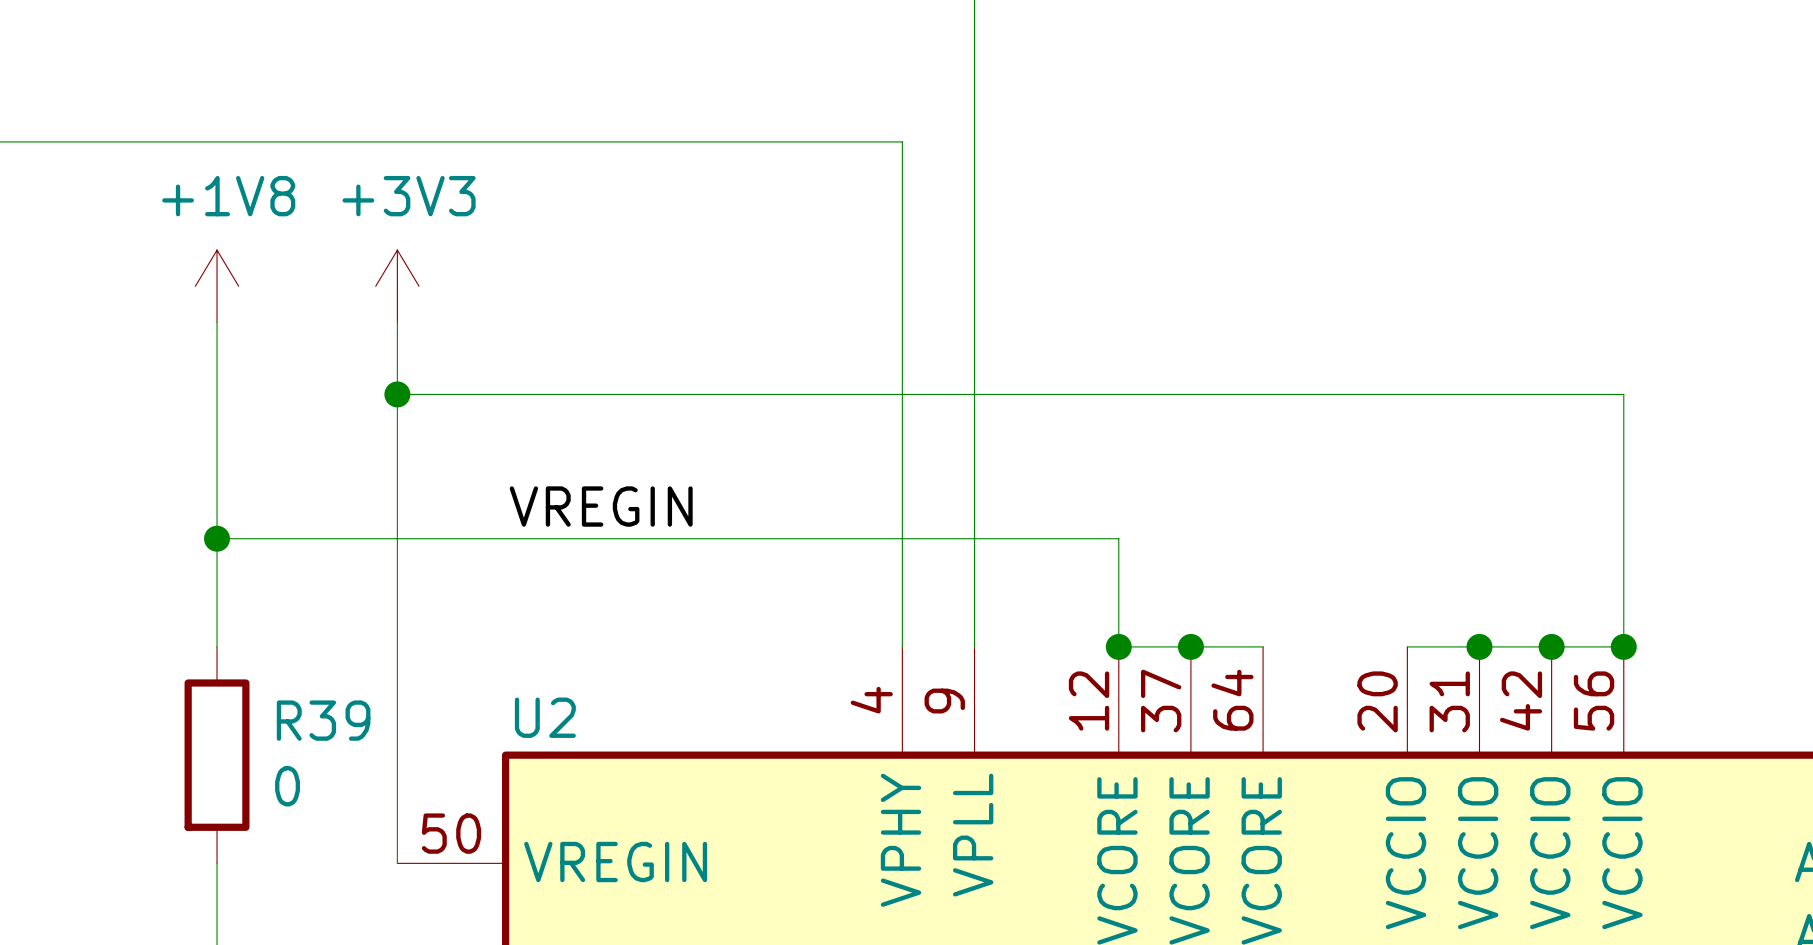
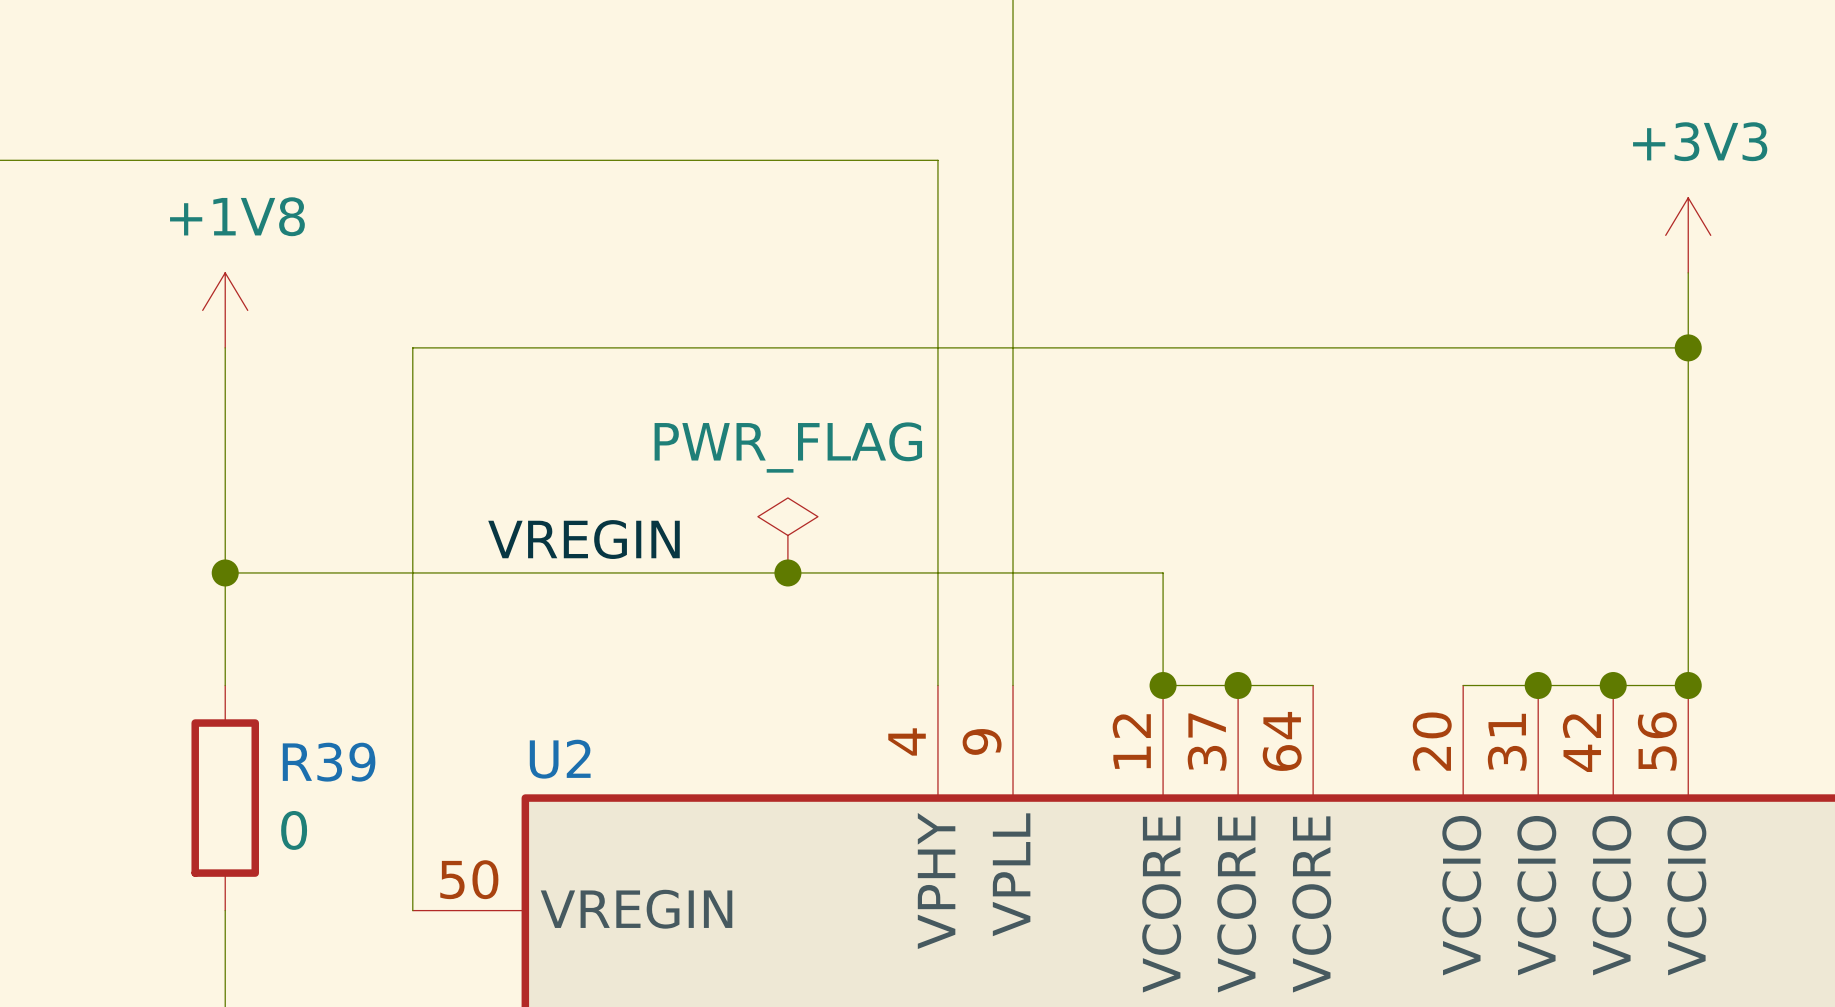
power symbol: none -> +3V3 (1688, 235)
power symbol: +3V3 (397, 286) -> none
wire: none -> (412, 347) (1688, 347)
junction: none -> (1688, 347)
wire: (397, 394) (1623, 394) -> (1688, 272) (1688, 422)
junction: (397, 394) -> none
power symbol: none -> PWR_FLAG (787, 535)
label position: VREGIN (601, 506) -> VREGIN (583, 539)
junction: none -> (787, 572)

